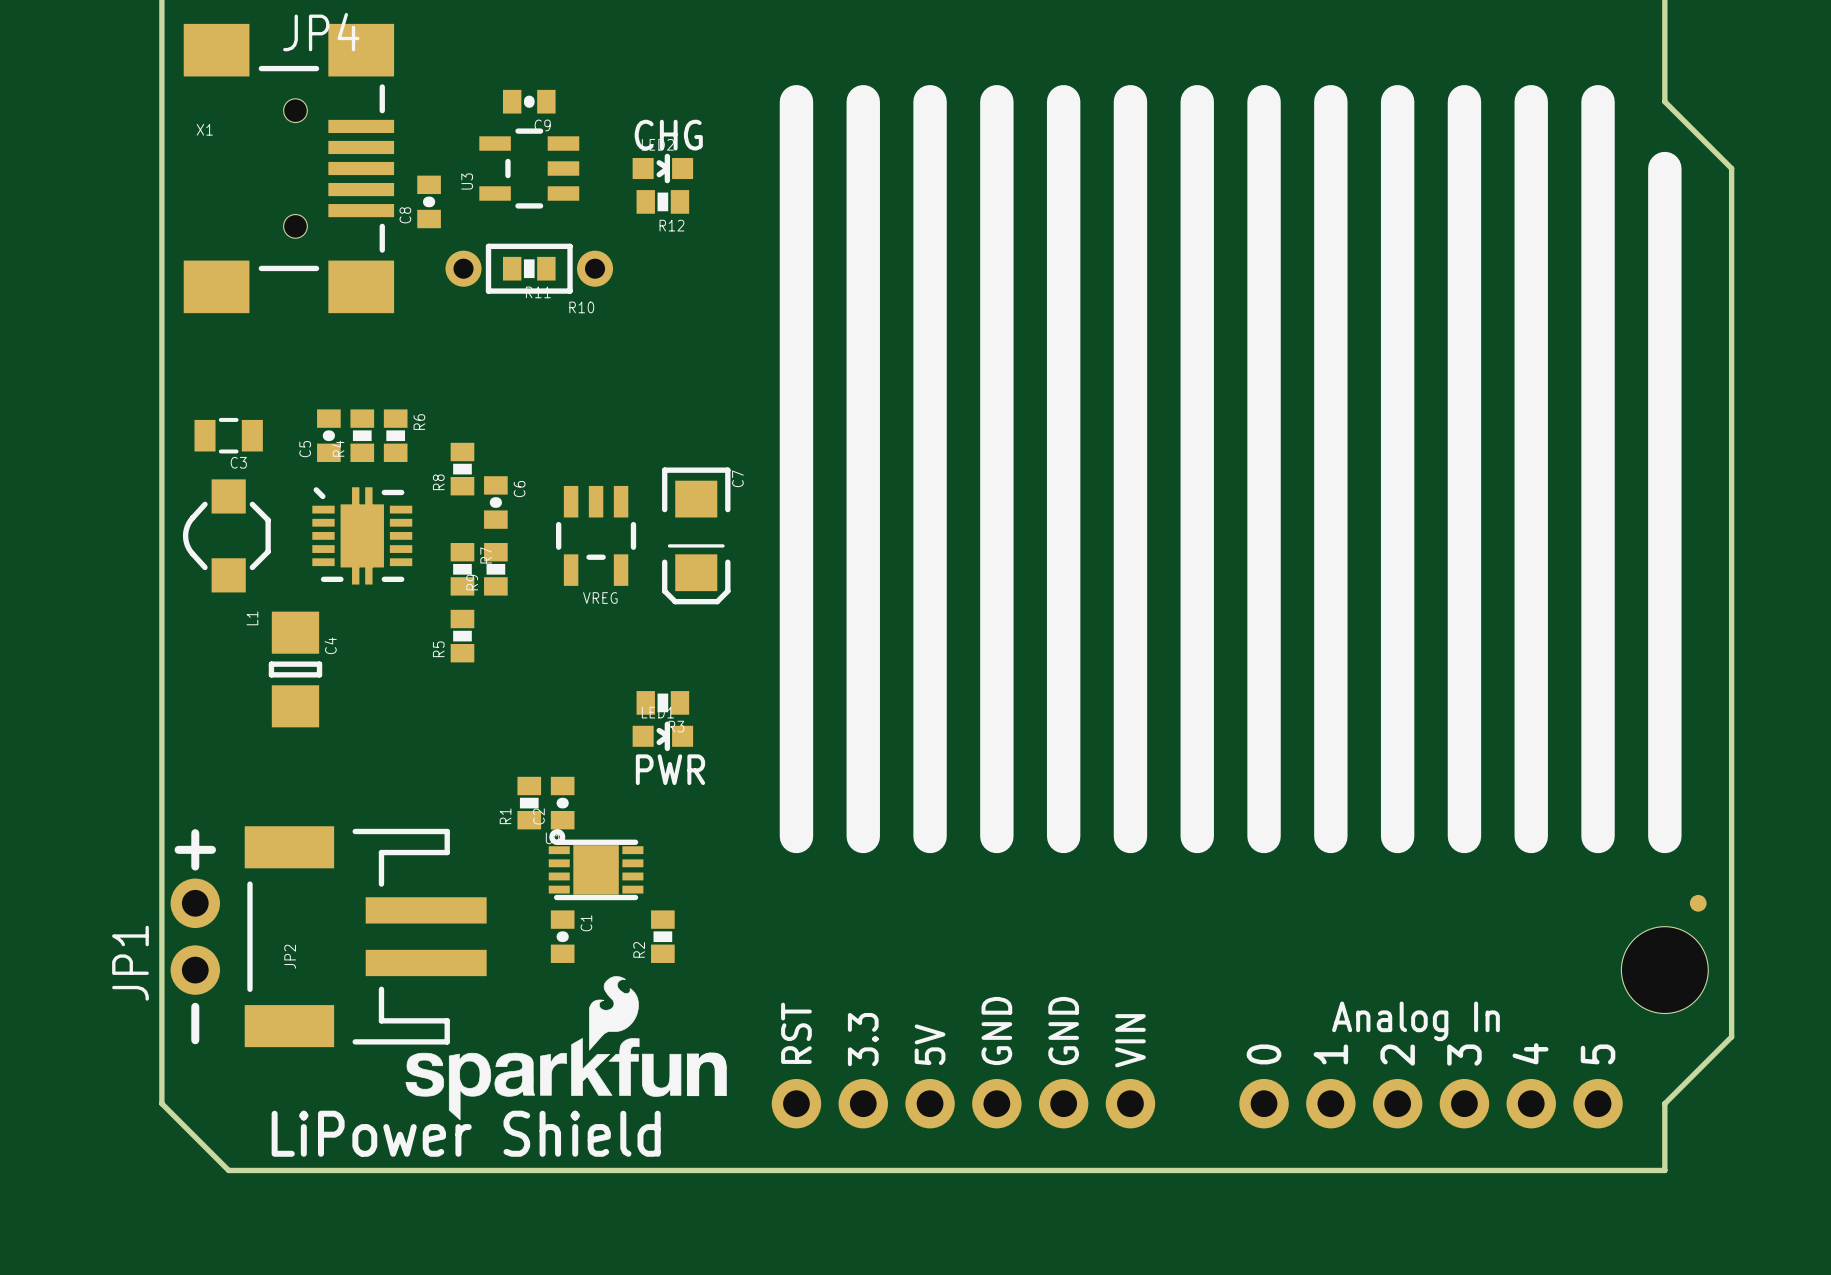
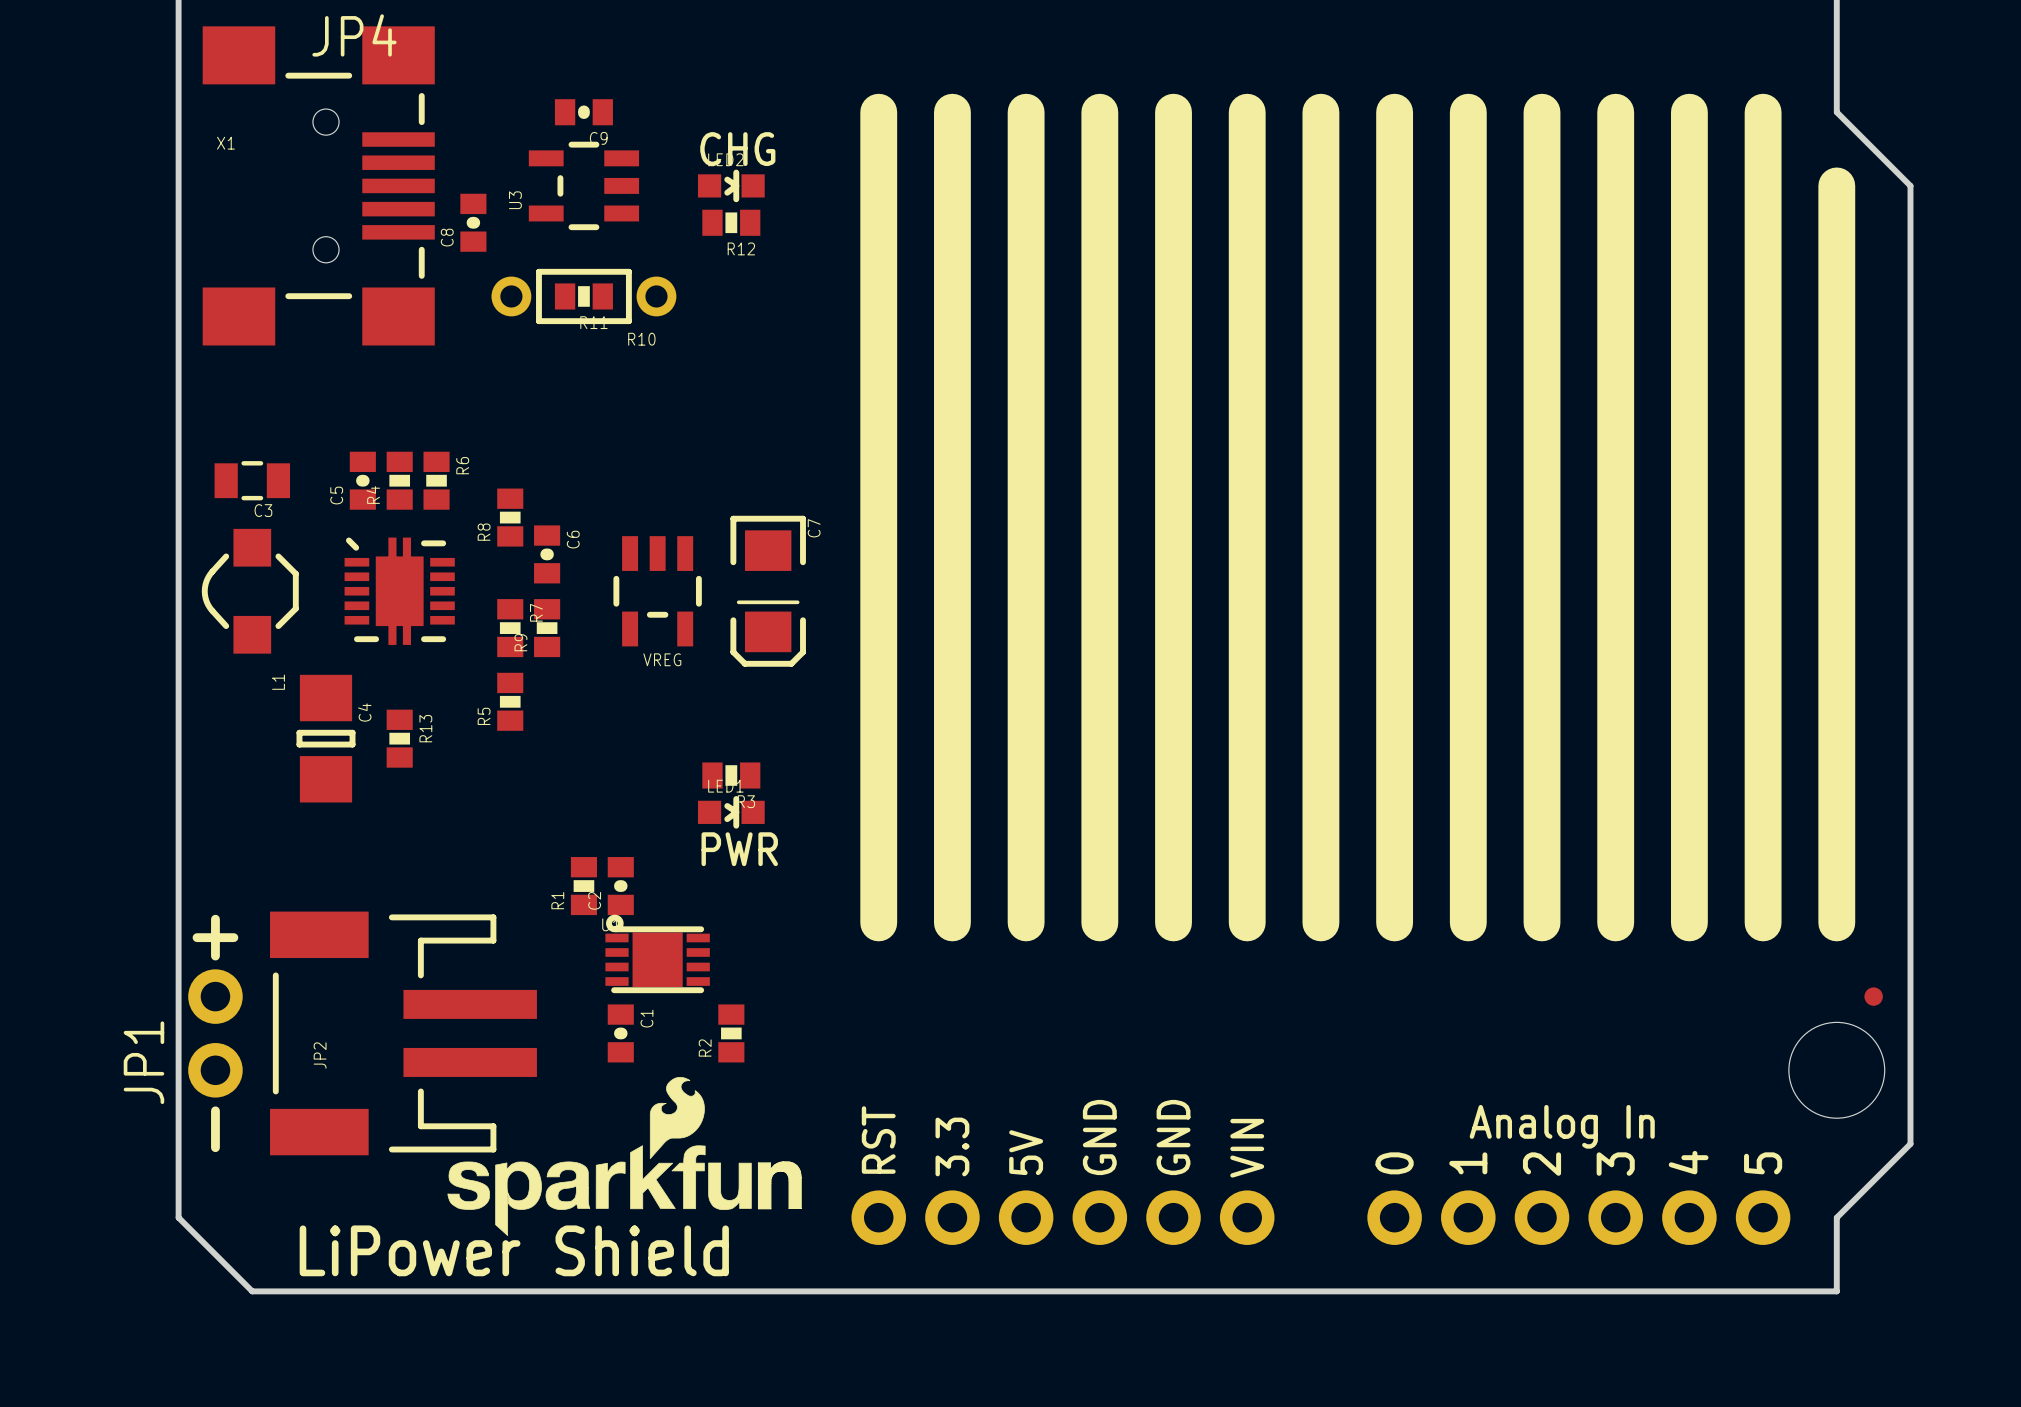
R13: none -> (399, 738)

